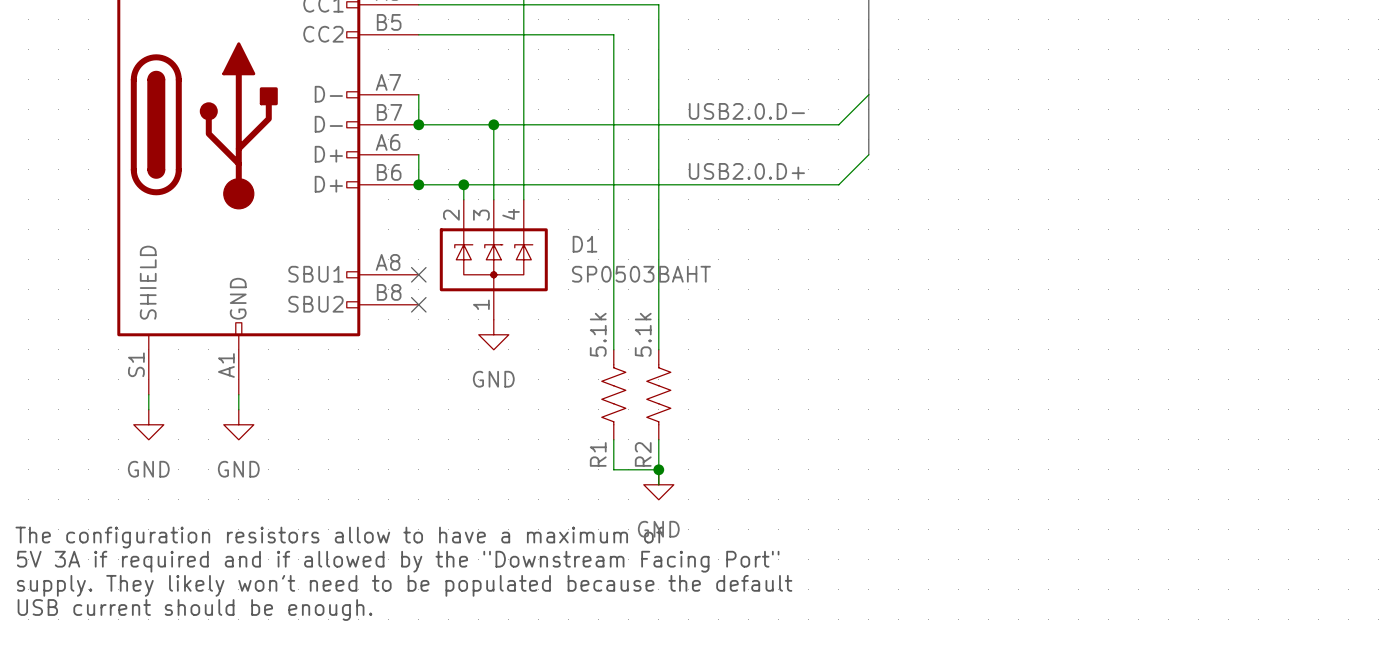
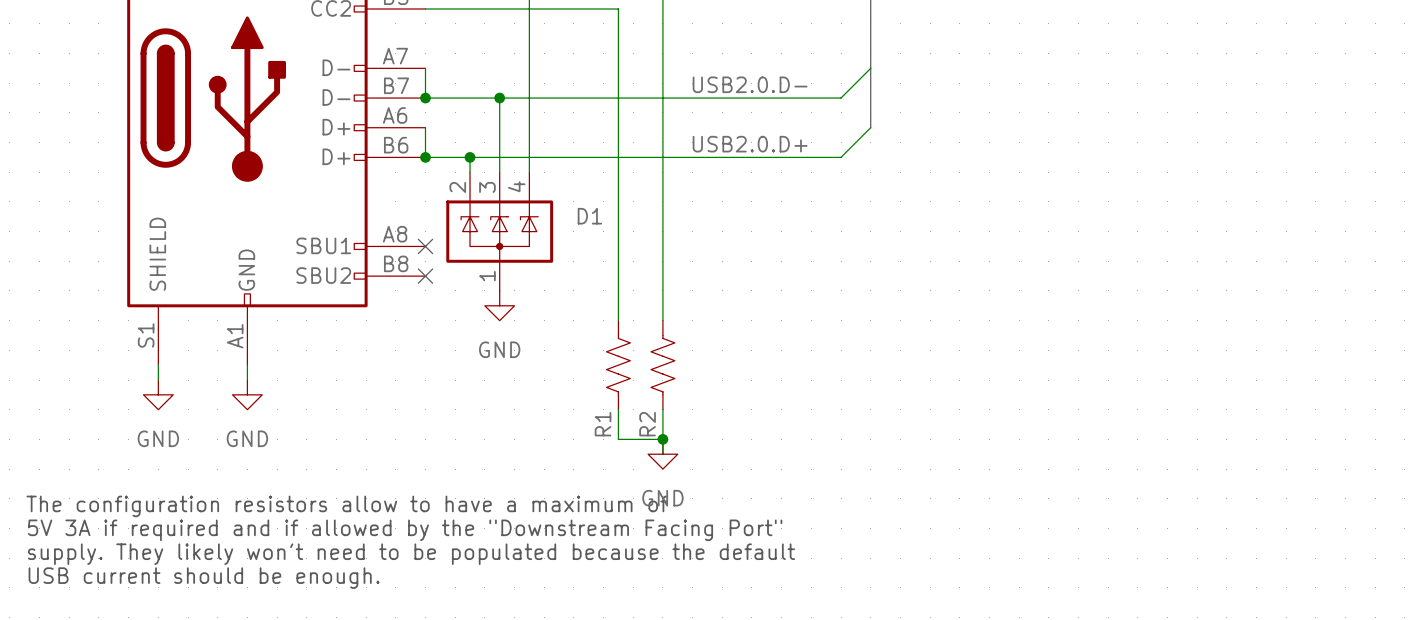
D1 value: SP0503BAHT (641, 274) -> none
R1 value: 5.1k (598, 334) -> none
R2 value: 5.1k (643, 334) -> none

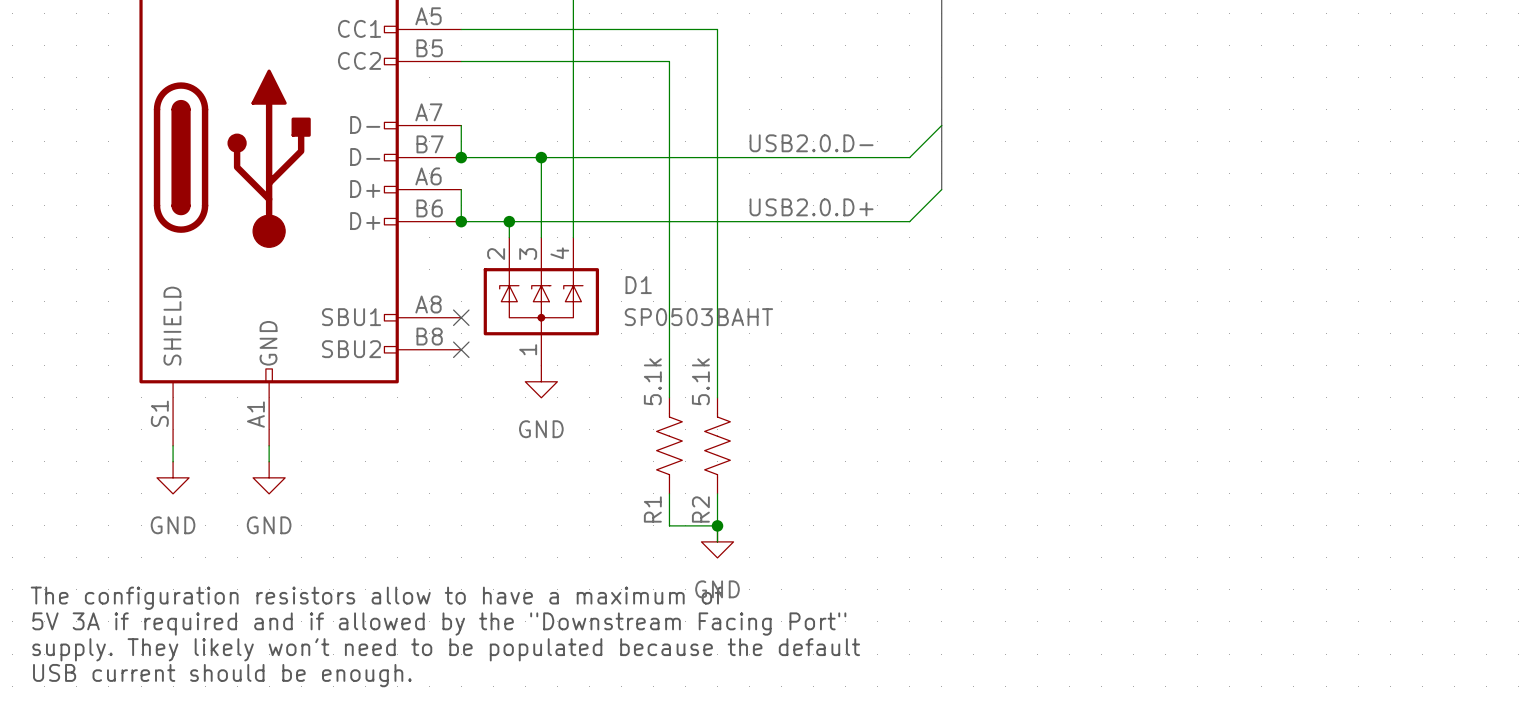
D1 value: none -> SP0503BAHT (698, 317)
R1 value: none -> 5.1k (652, 381)
R2 value: none -> 5.1k (700, 381)

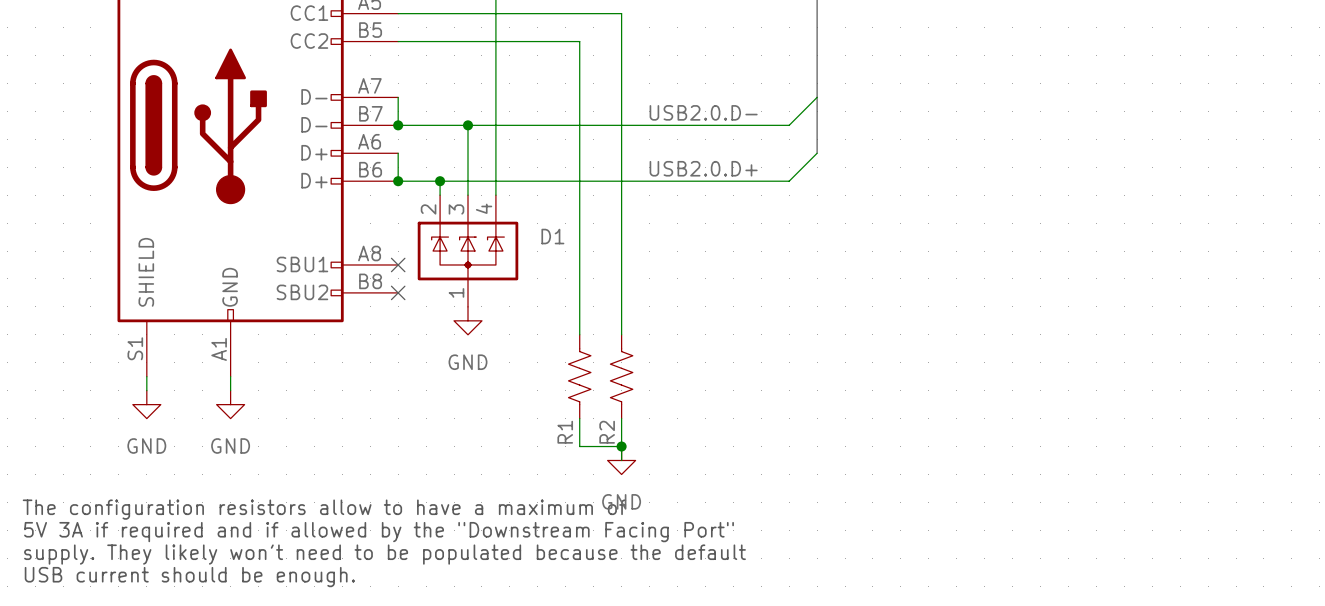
D1 value: SP0503BAHT (698, 317) -> none
R1 value: 5.1k (652, 381) -> none
R2 value: 5.1k (700, 381) -> none

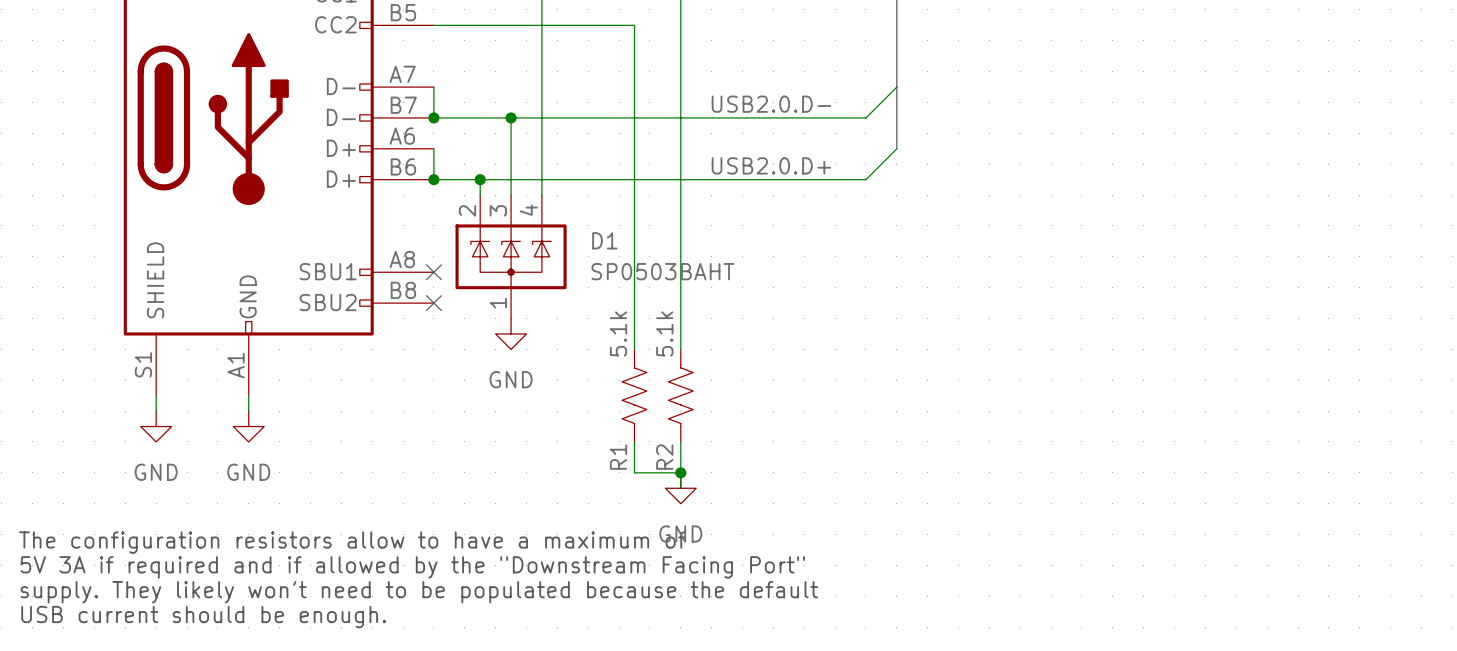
D1 value: none -> SP0503BAHT (662, 271)
R1 value: none -> 5.1k (618, 333)
R2 value: none -> 5.1k (664, 333)

